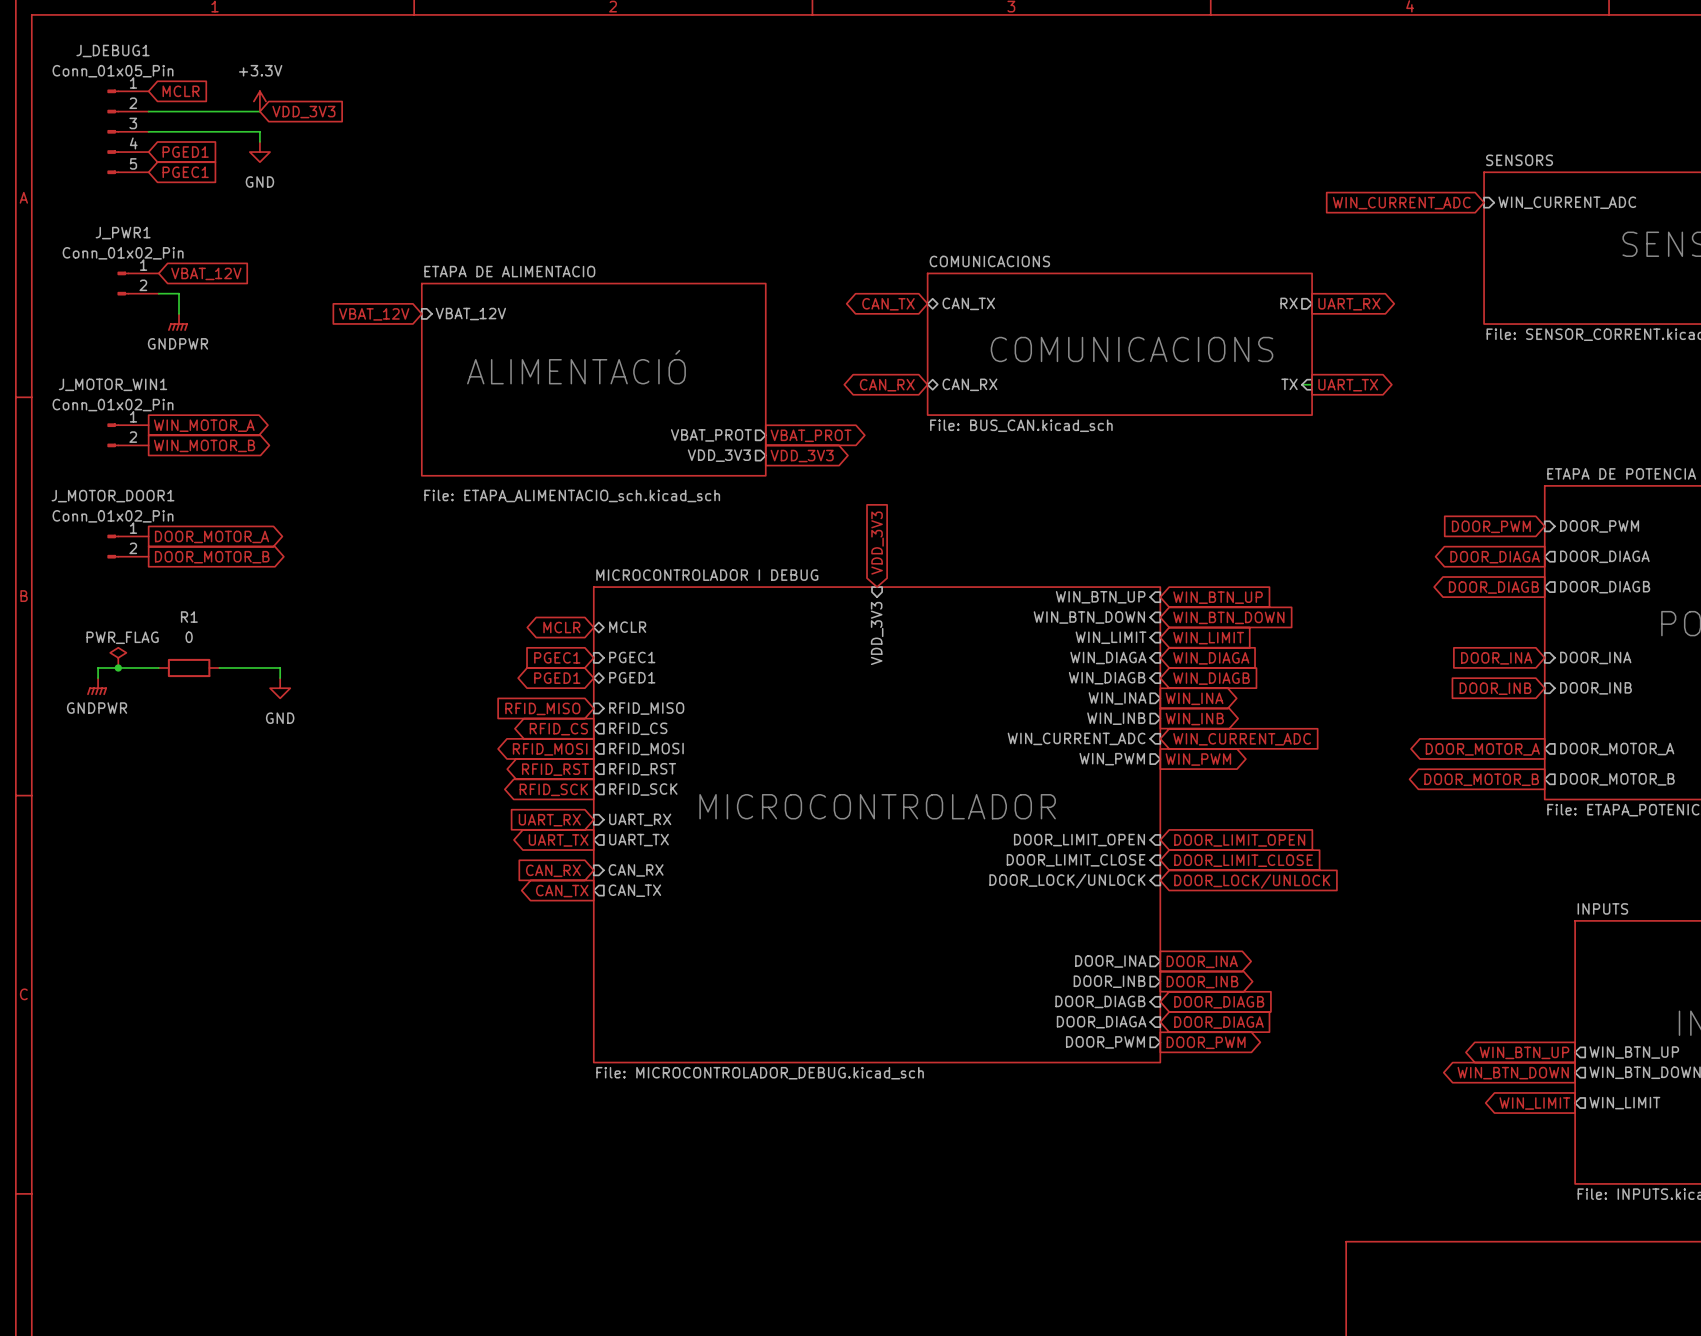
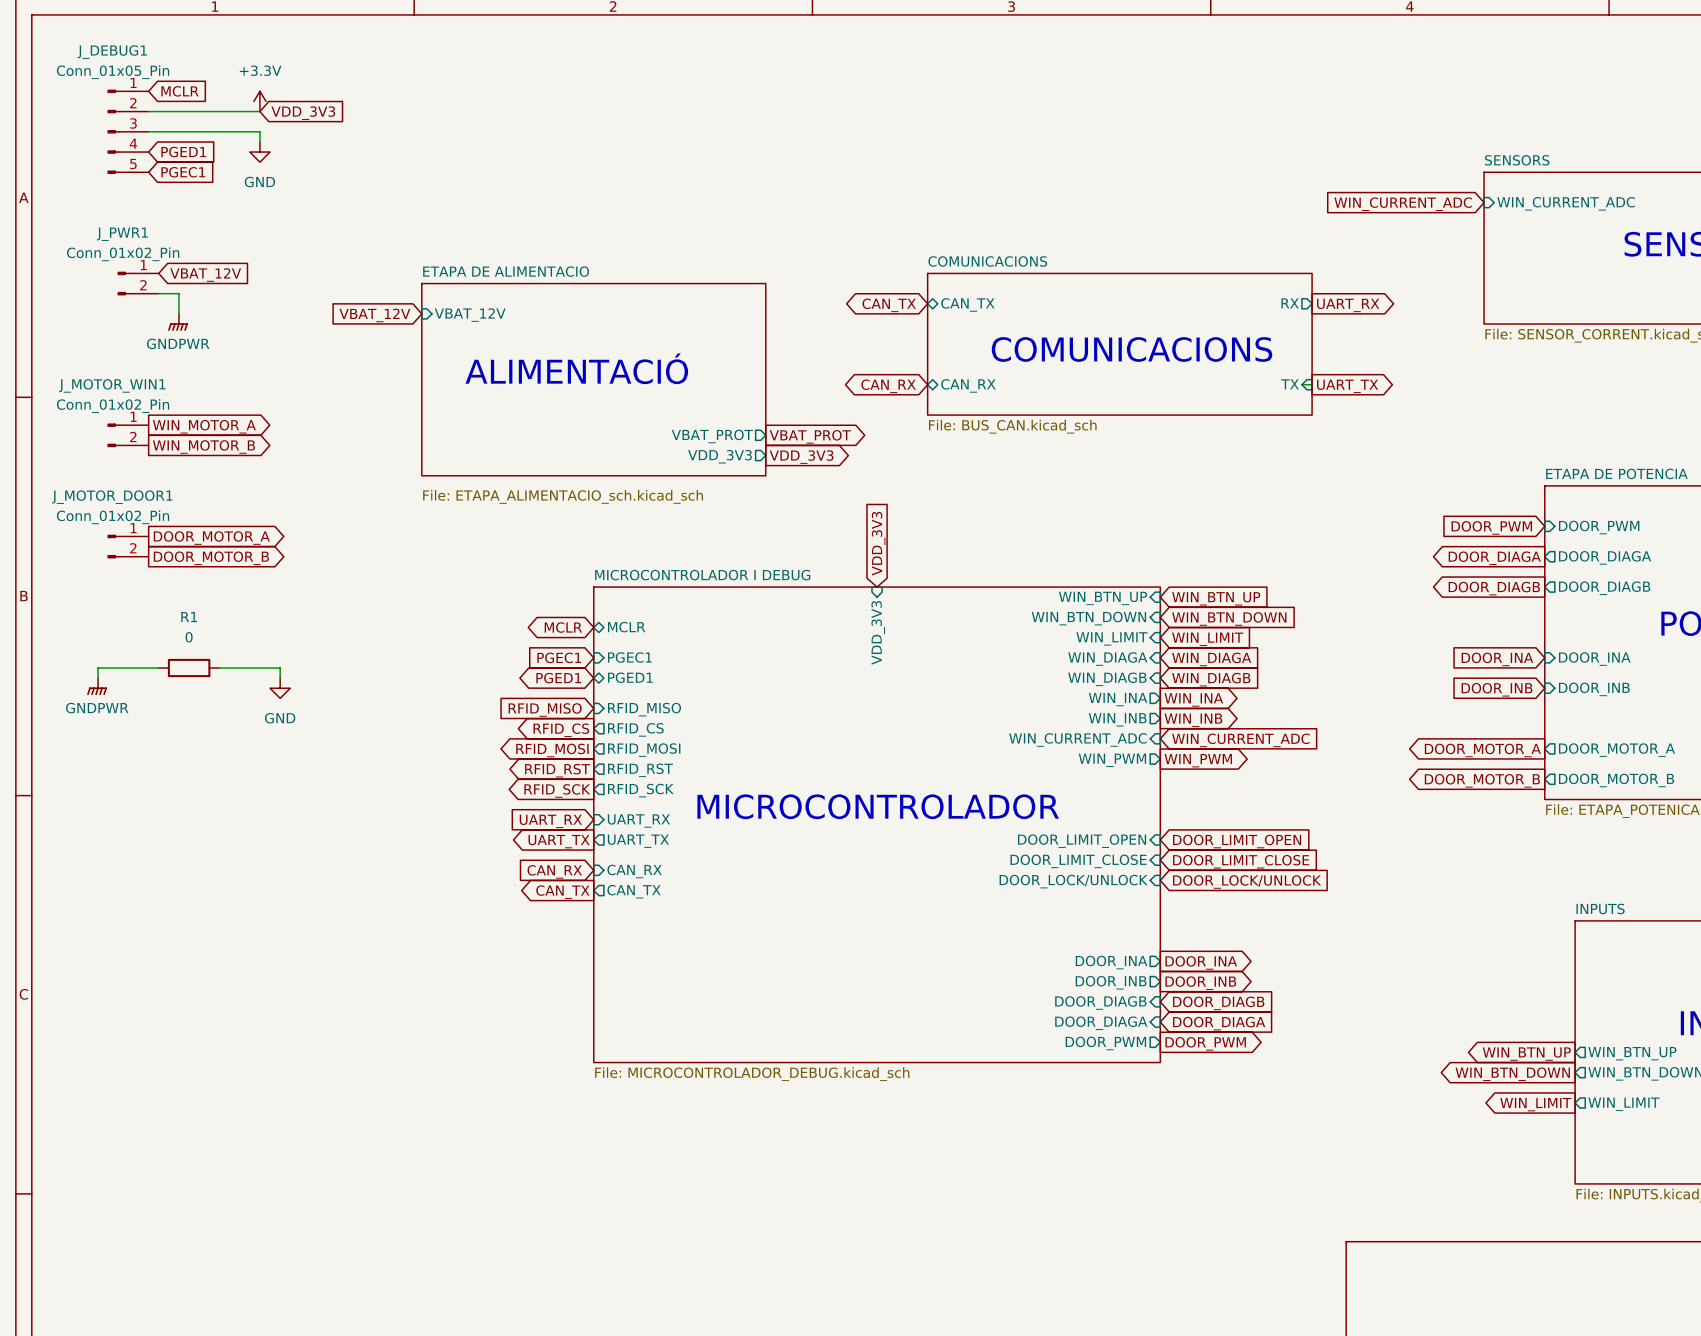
power symbol: PWR_FLAG (118, 657) -> none
junction: (118, 667) -> none

